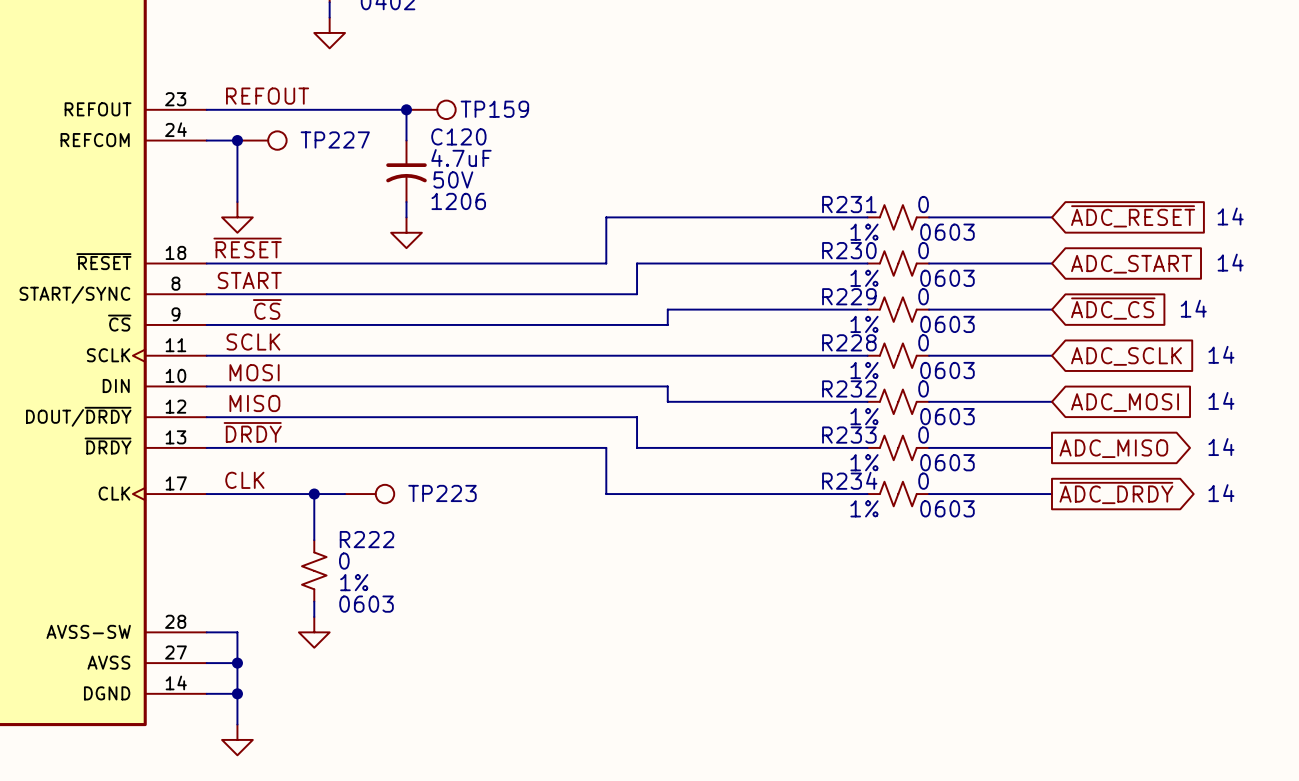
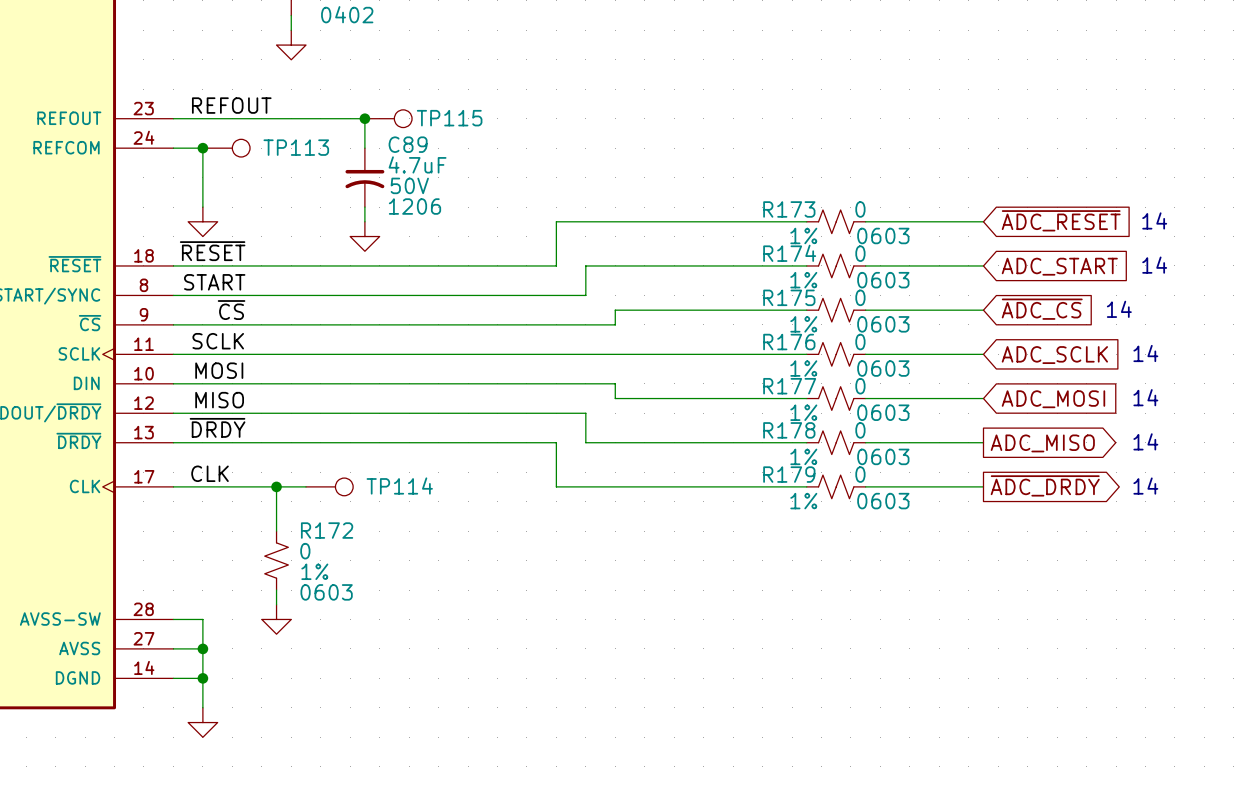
TP159 name: TP159 (494, 109) -> TP115 (449, 118)
C120 name: C120 (458, 136) -> C89 (408, 144)
TP227 name: TP227 (335, 139) -> TP113 (296, 147)
R231 name: R231 (849, 204) -> R173 (789, 209)
R230 name: R230 (849, 250) -> R174 (789, 253)
R229 name: R229 (849, 296) -> R175 (789, 297)
R228 name: R228 (849, 342) -> R176 (789, 342)
R232 name: R232 (849, 388) -> R177 (789, 386)
R233 name: R233 (849, 435) -> R178 (789, 430)
R234 name: R234 (849, 480) -> R179 (789, 474)
TP223 name: TP223 (442, 493) -> TP114 (399, 486)
R222 name: R222 (367, 539) -> R172 (327, 530)

